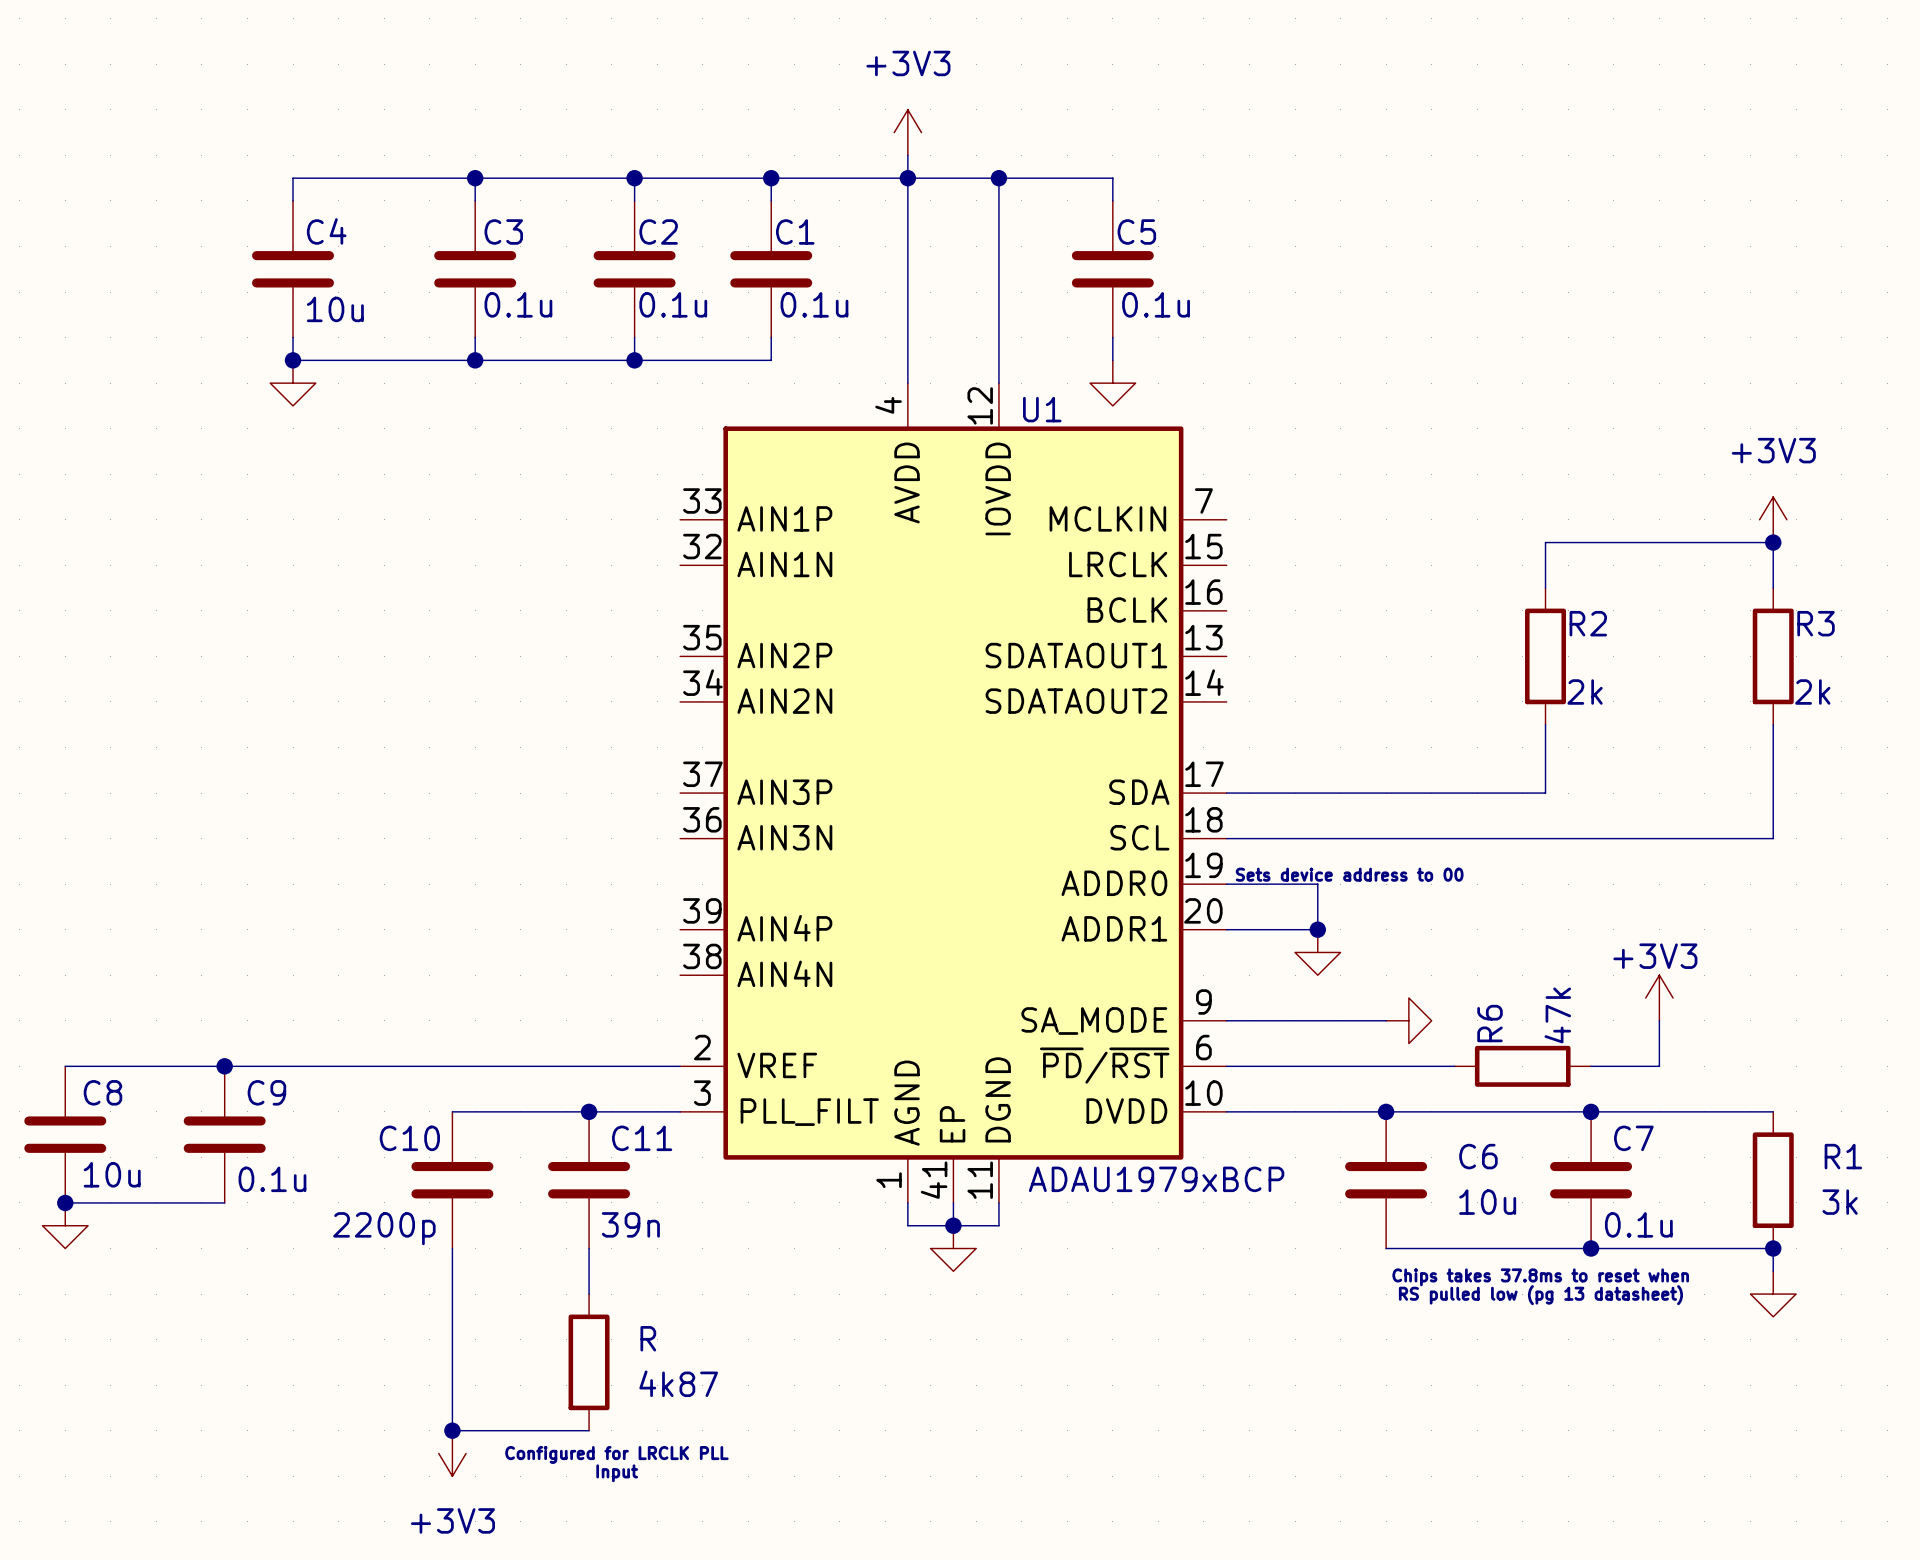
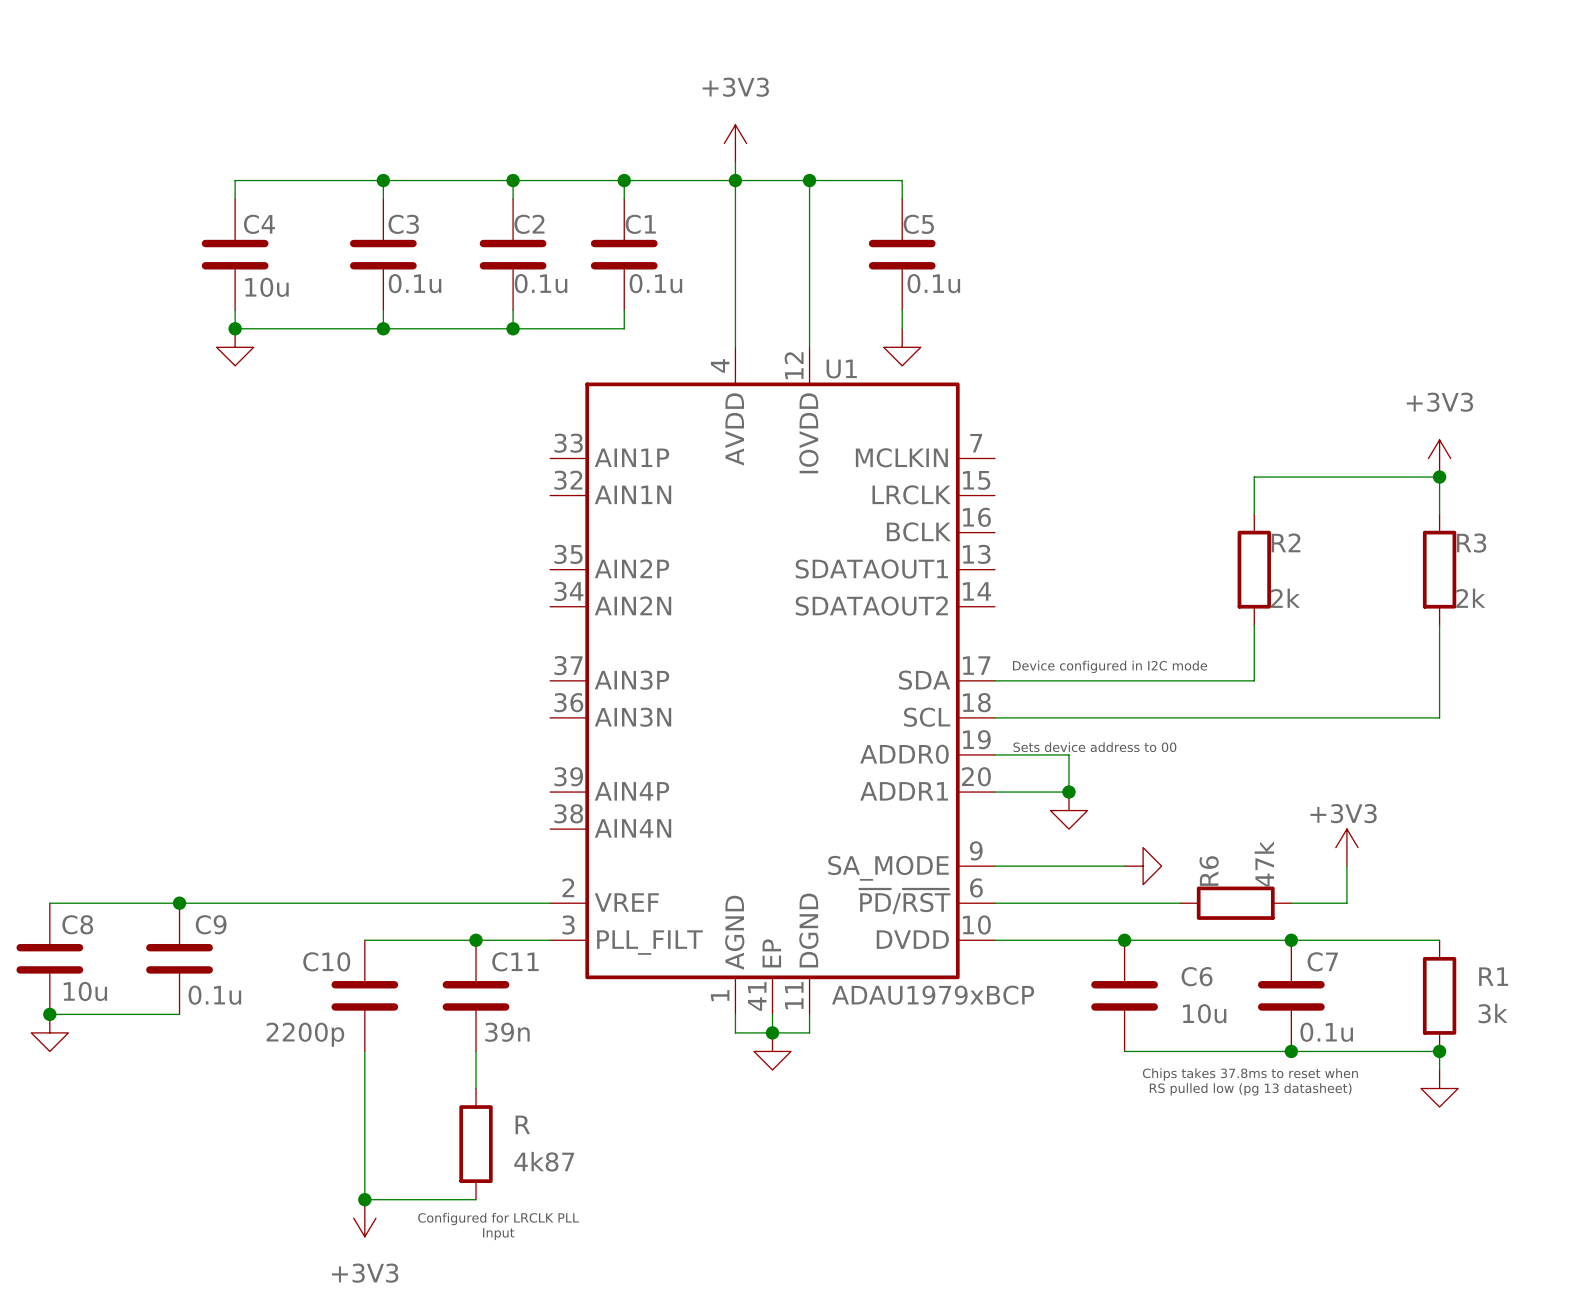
text: none -> Device configured in I2C mode (1110, 666)

